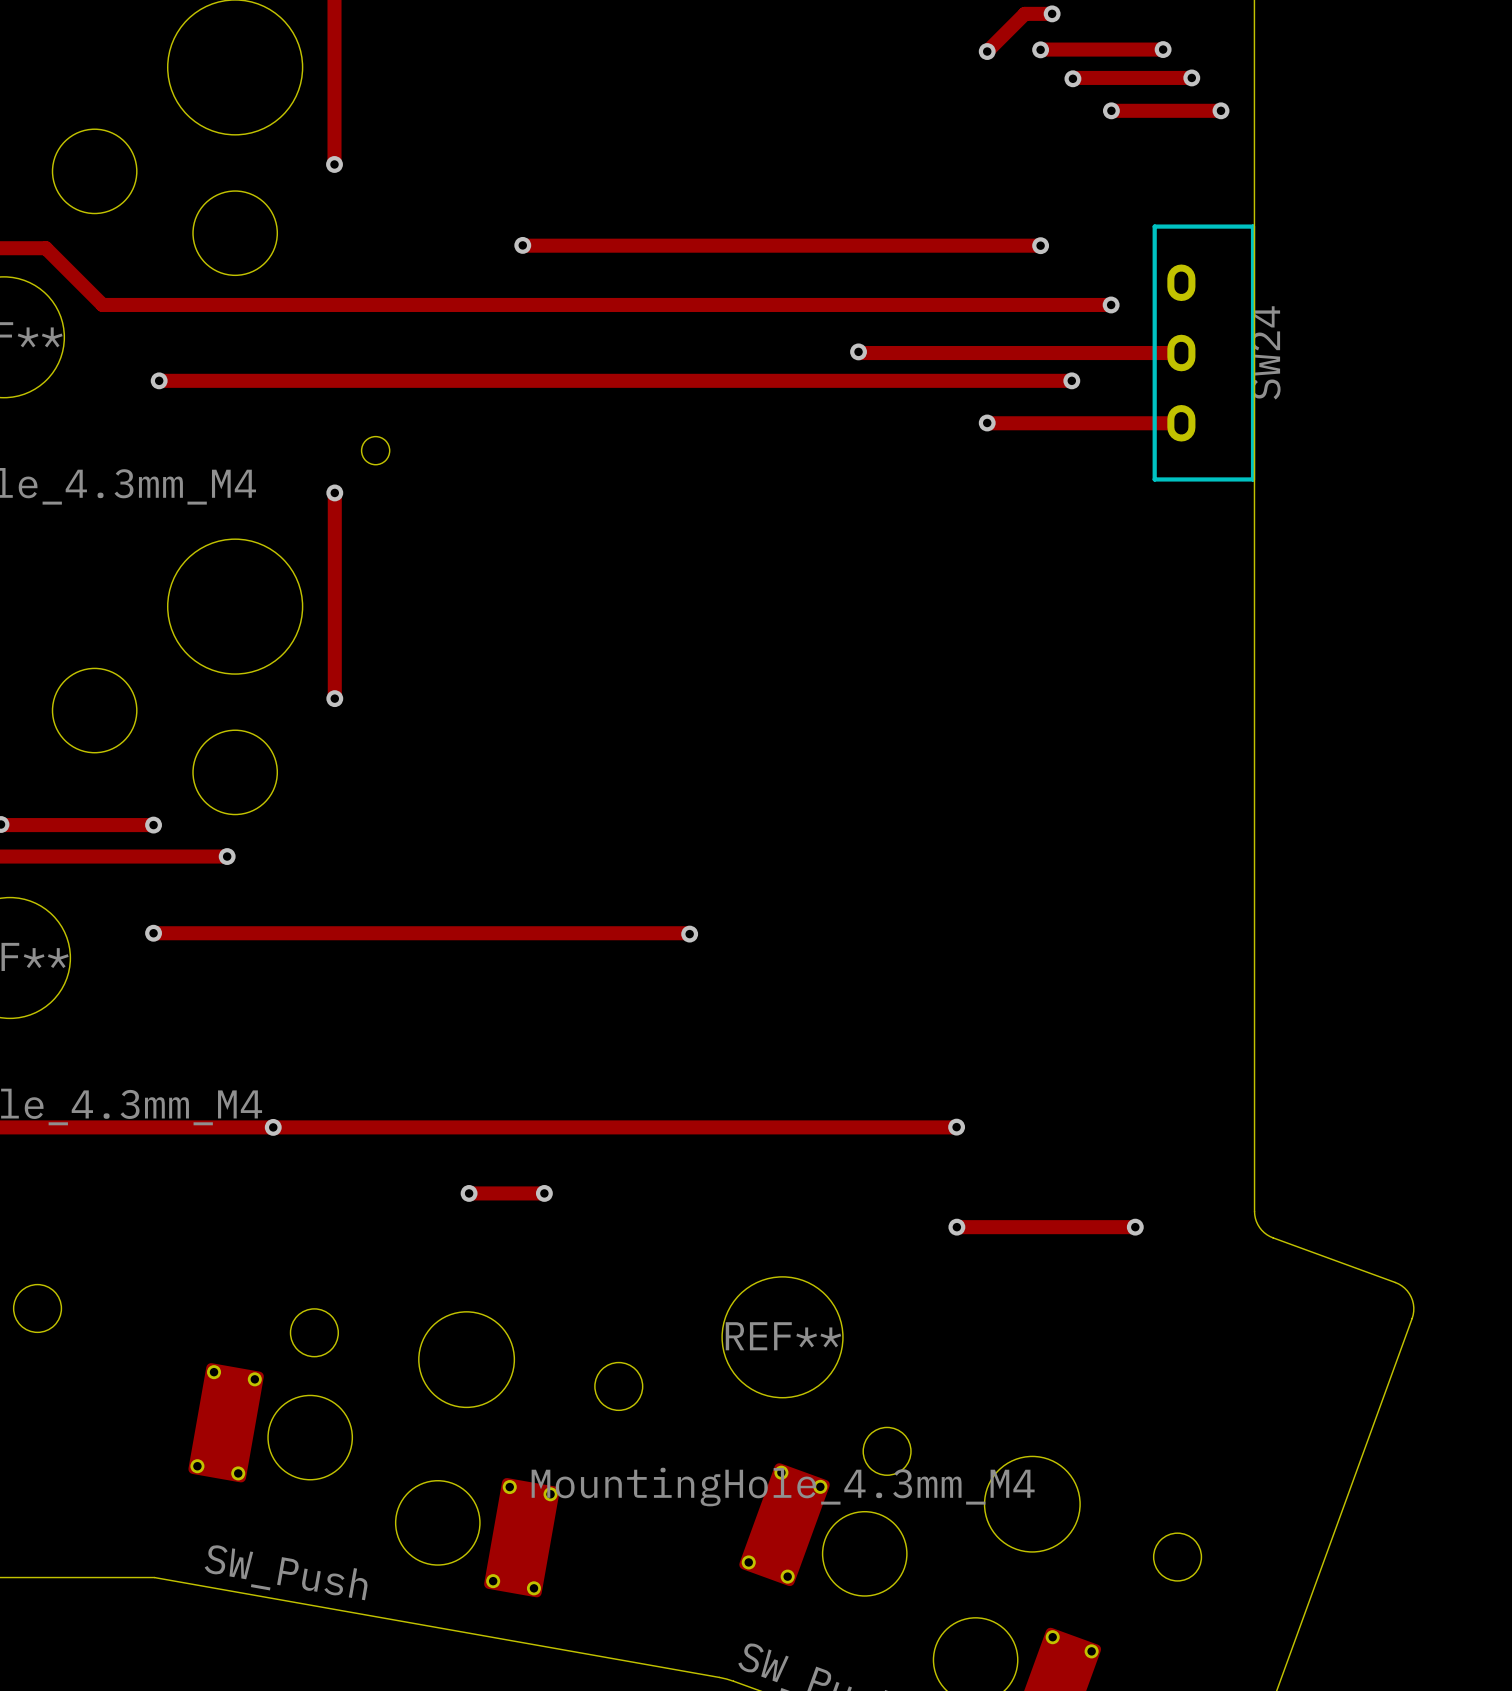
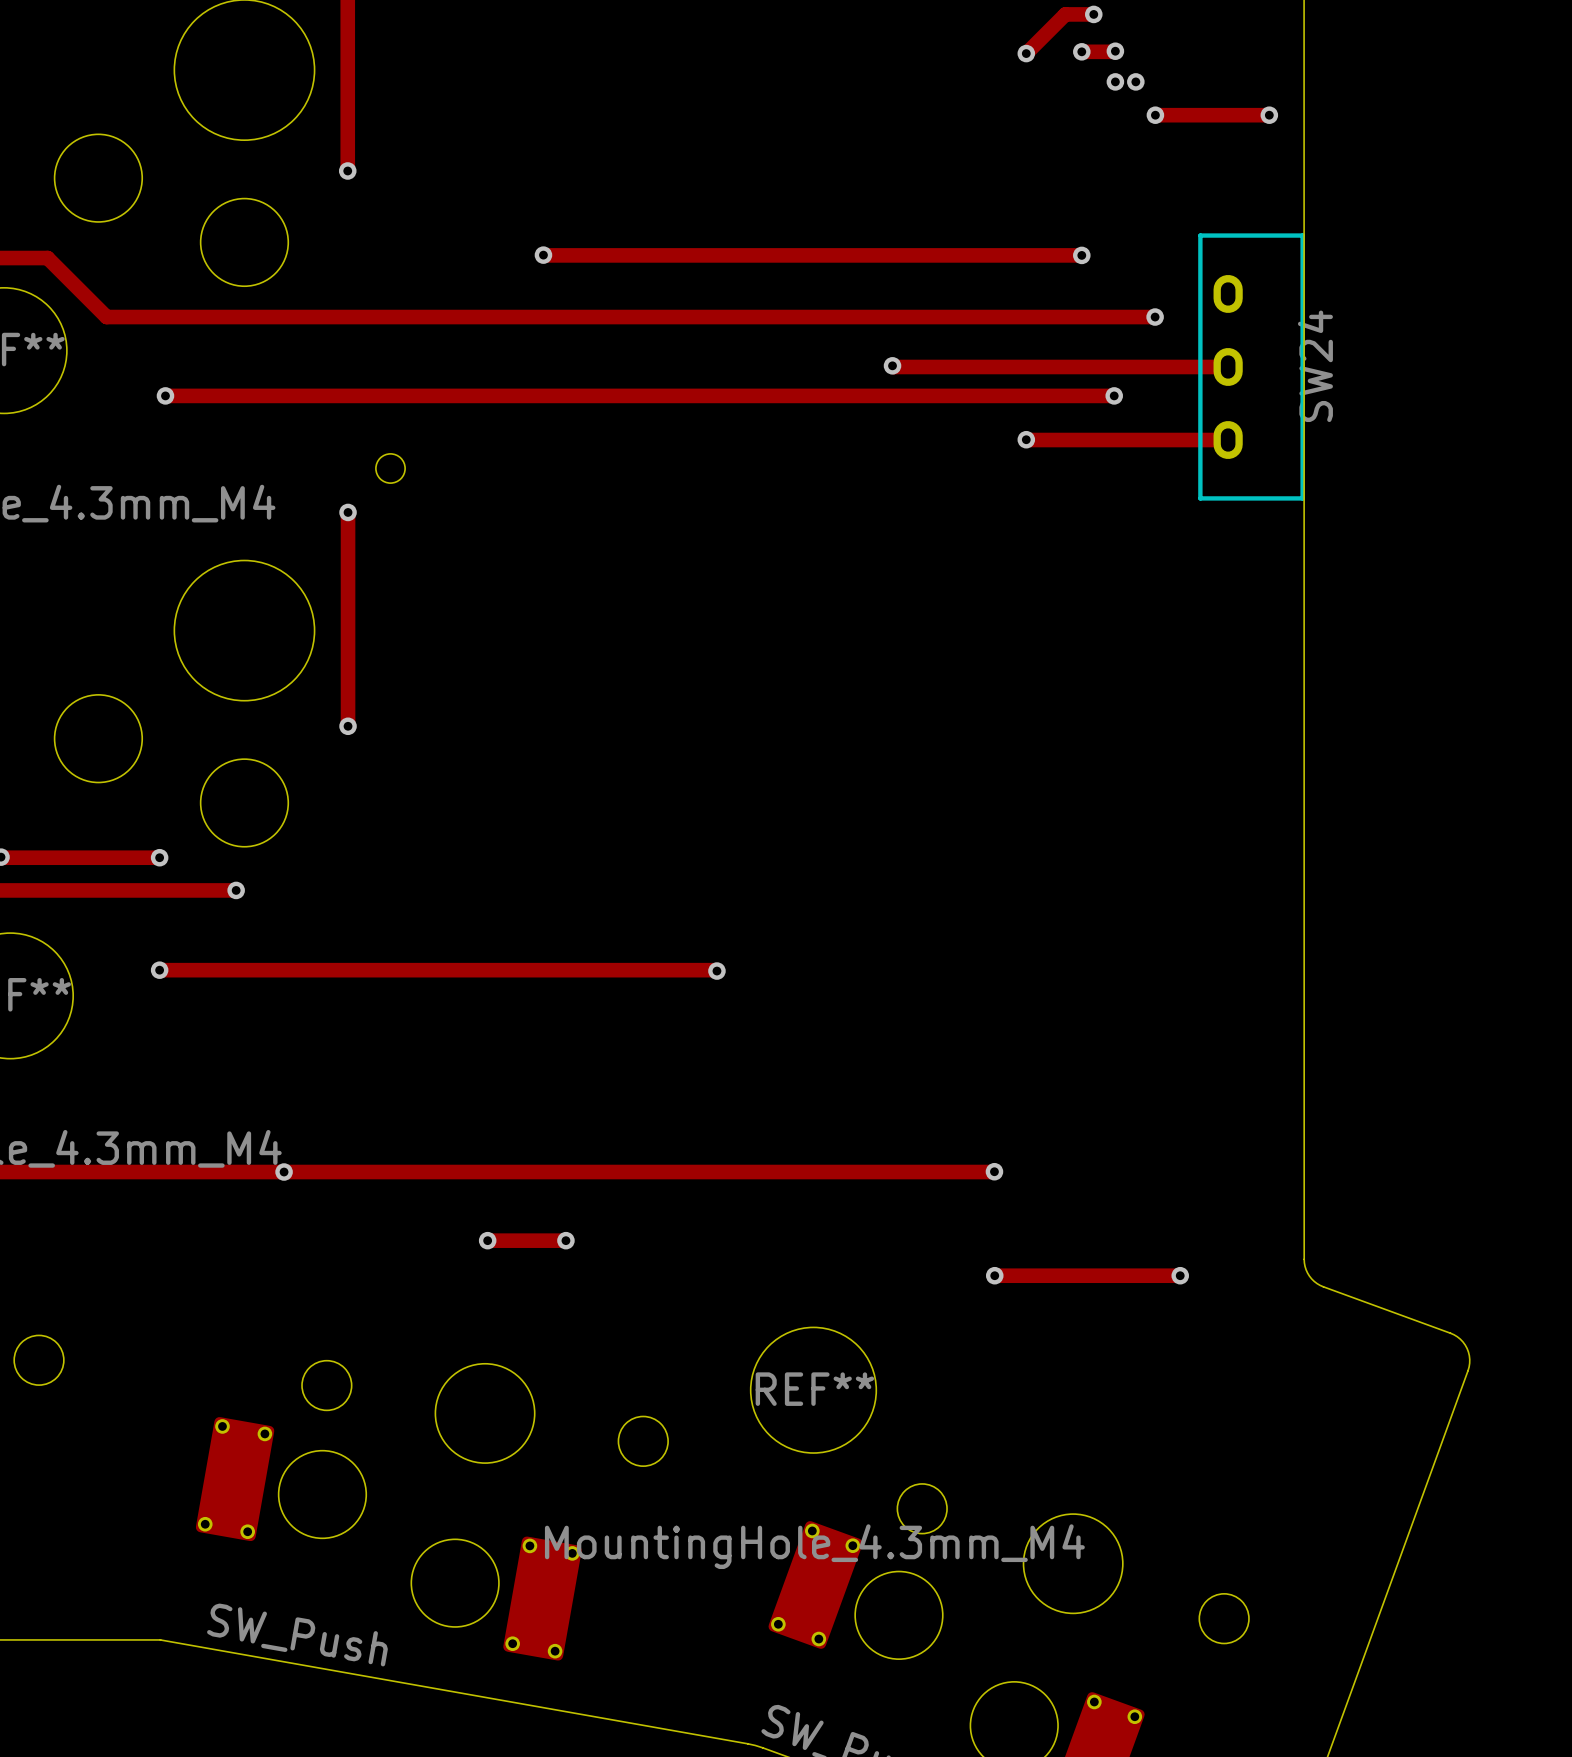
track: (1040, 49) (1163, 49) -> (1081, 51) (1115, 51)
via: none -> (1115, 51)
via: (1163, 49) -> none
track: (1073, 77) (1191, 77) -> none
via: (1191, 77) -> none
via: none -> (1135, 81)

